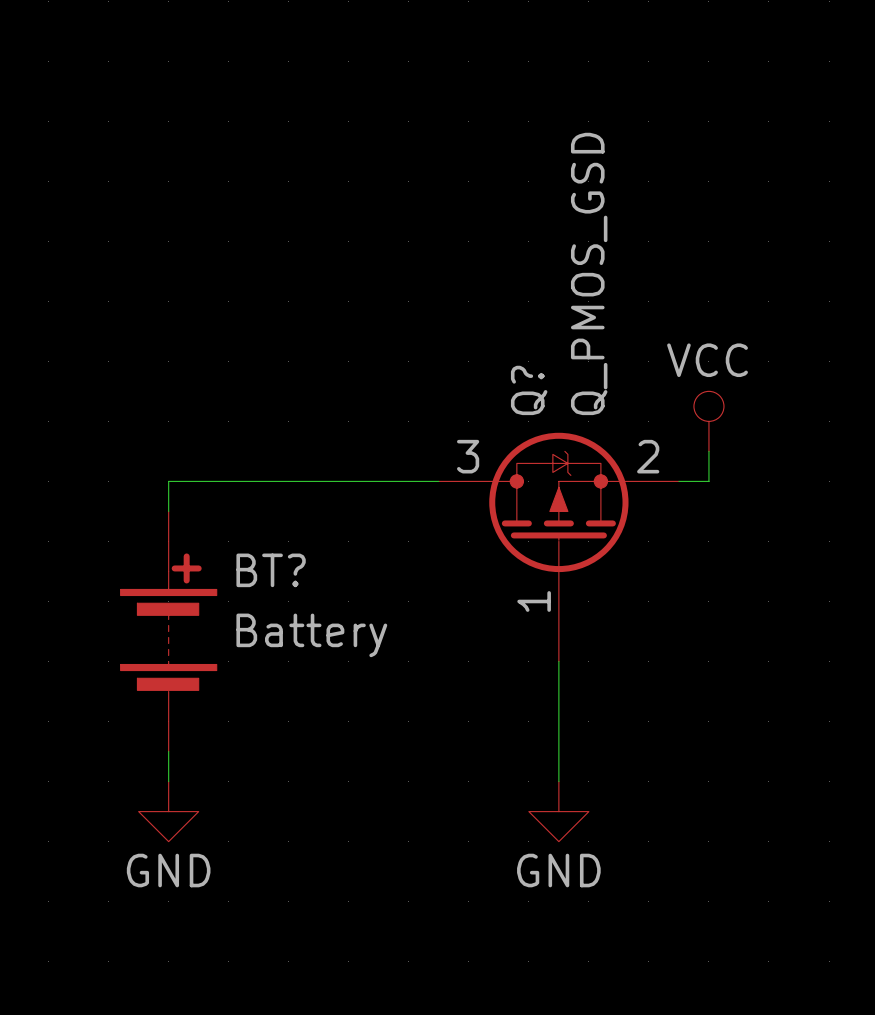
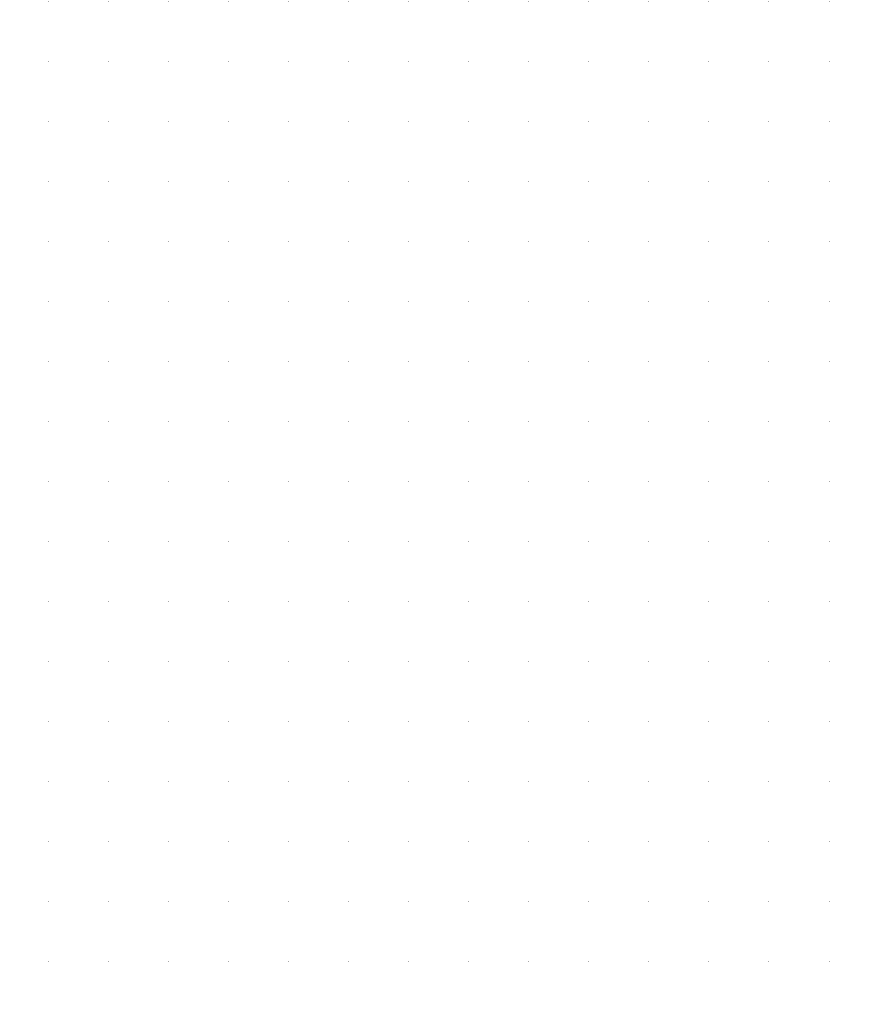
power symbol: VCC (708, 421) -> none
wire: (708, 451) (708, 481) (678, 481) -> none
wire: (438, 481) (168, 481) (168, 511) -> none
Q?: Q_PMOS_GSD (558, 547) -> none
BT?: Battery (168, 631) -> none
wire: (558, 661) (558, 781) -> none
wire: (168, 751) (168, 781) -> none
power symbol: GND (168, 811) -> none
power symbol: GND (558, 811) -> none

